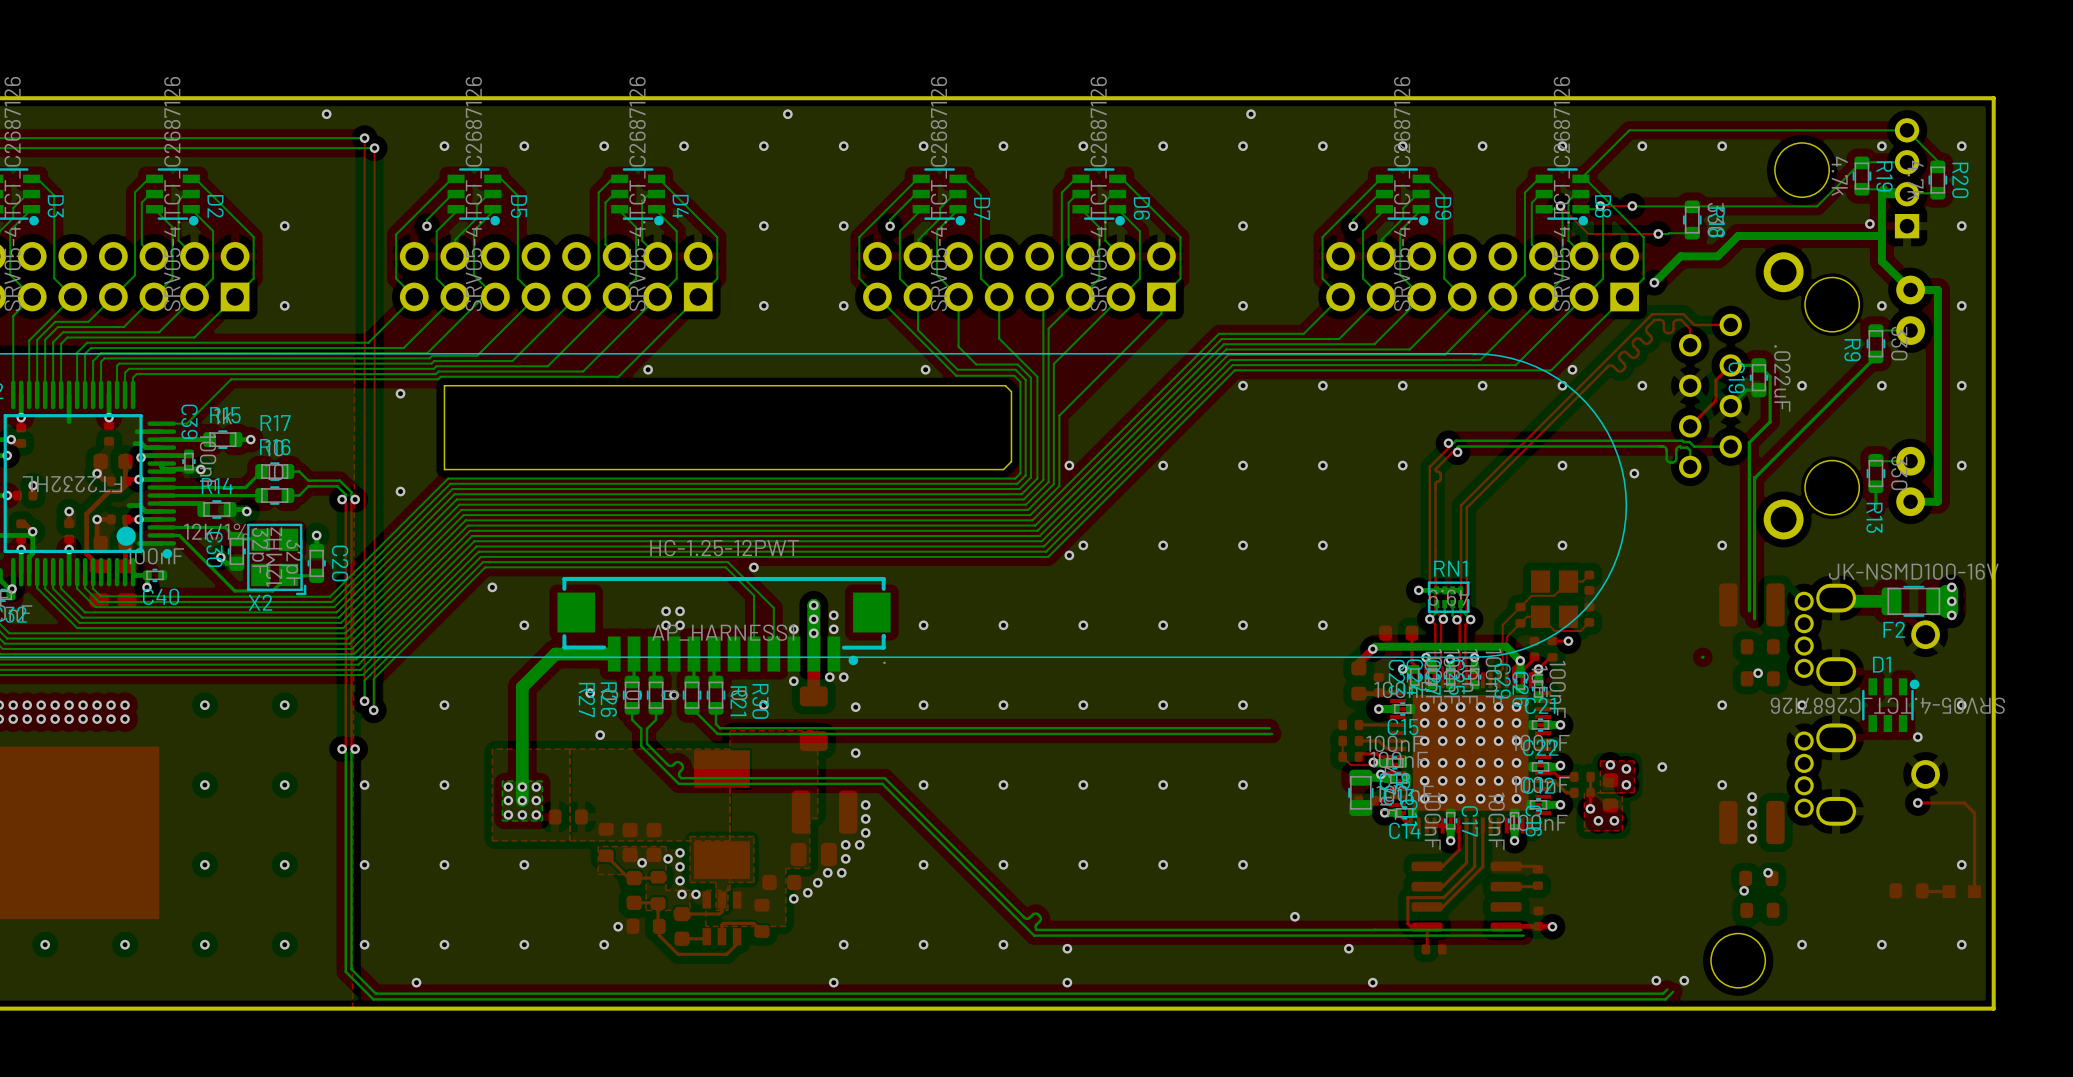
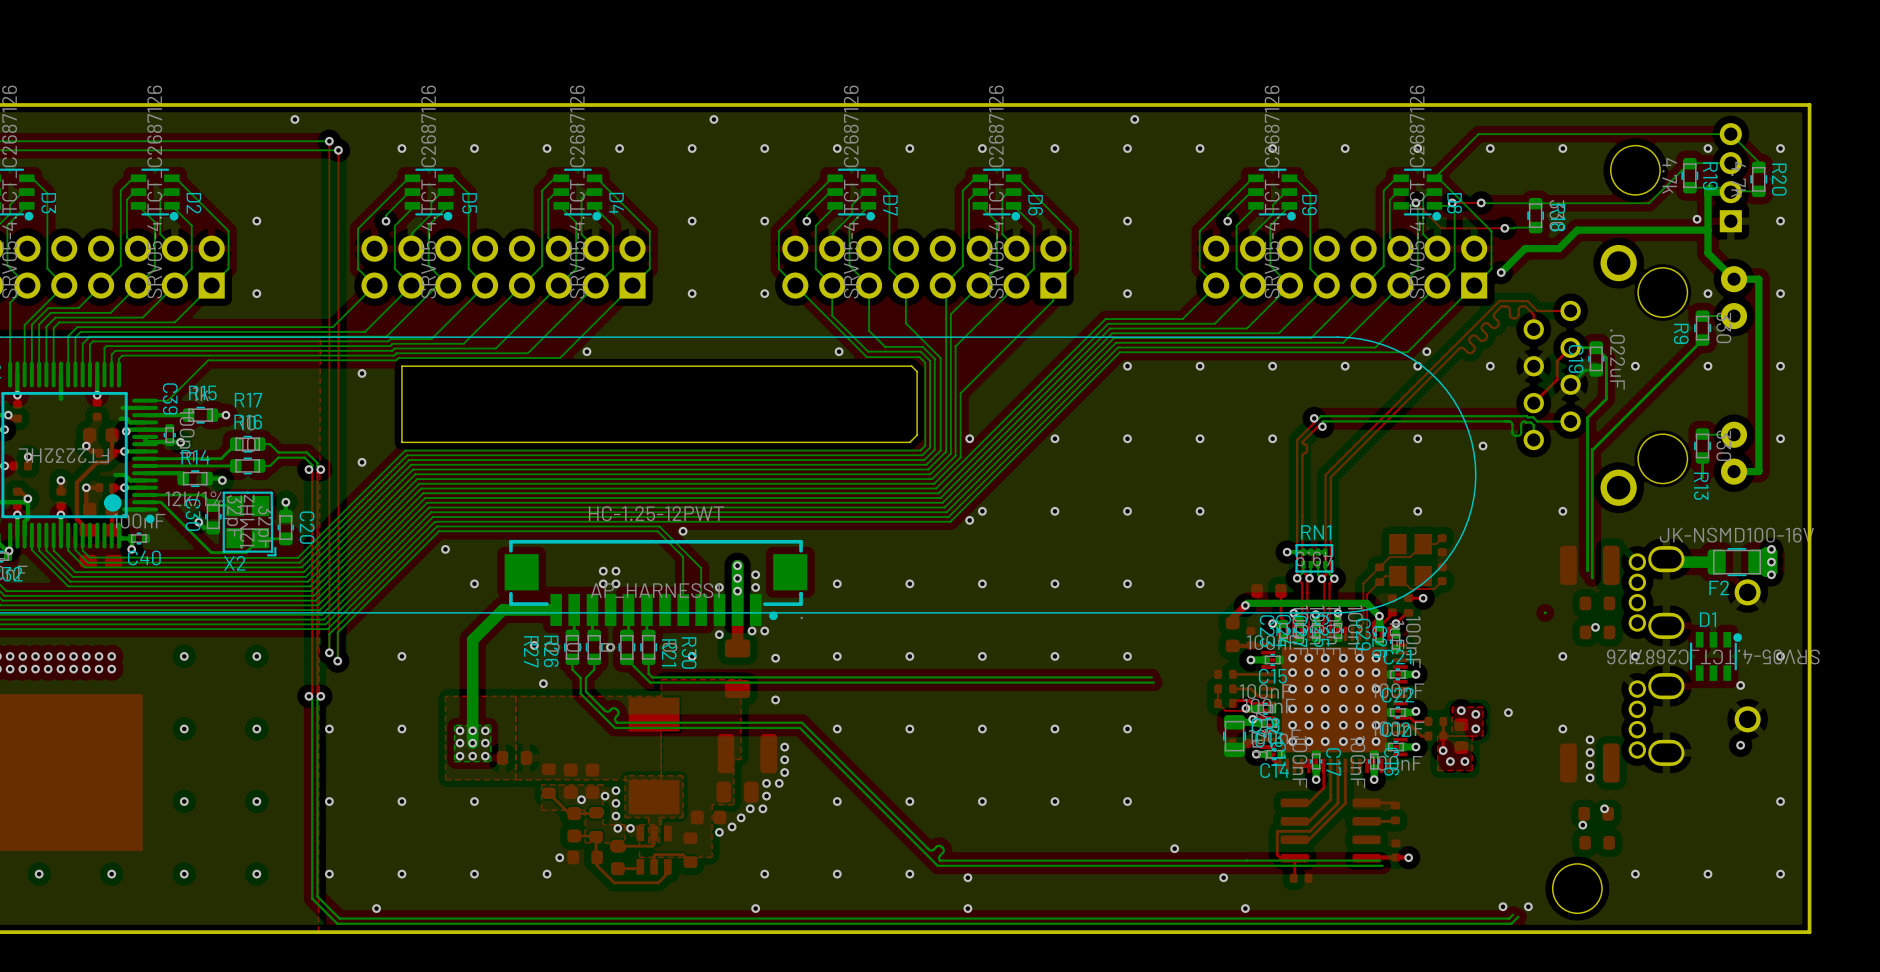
top track: (1917, 802) (1964, 802) (1974, 813) (1974, 891) -> none
part: (1908, 890) -> none
top track: (1922, 890) (1948, 891) -> none
part: (1961, 891) -> none

